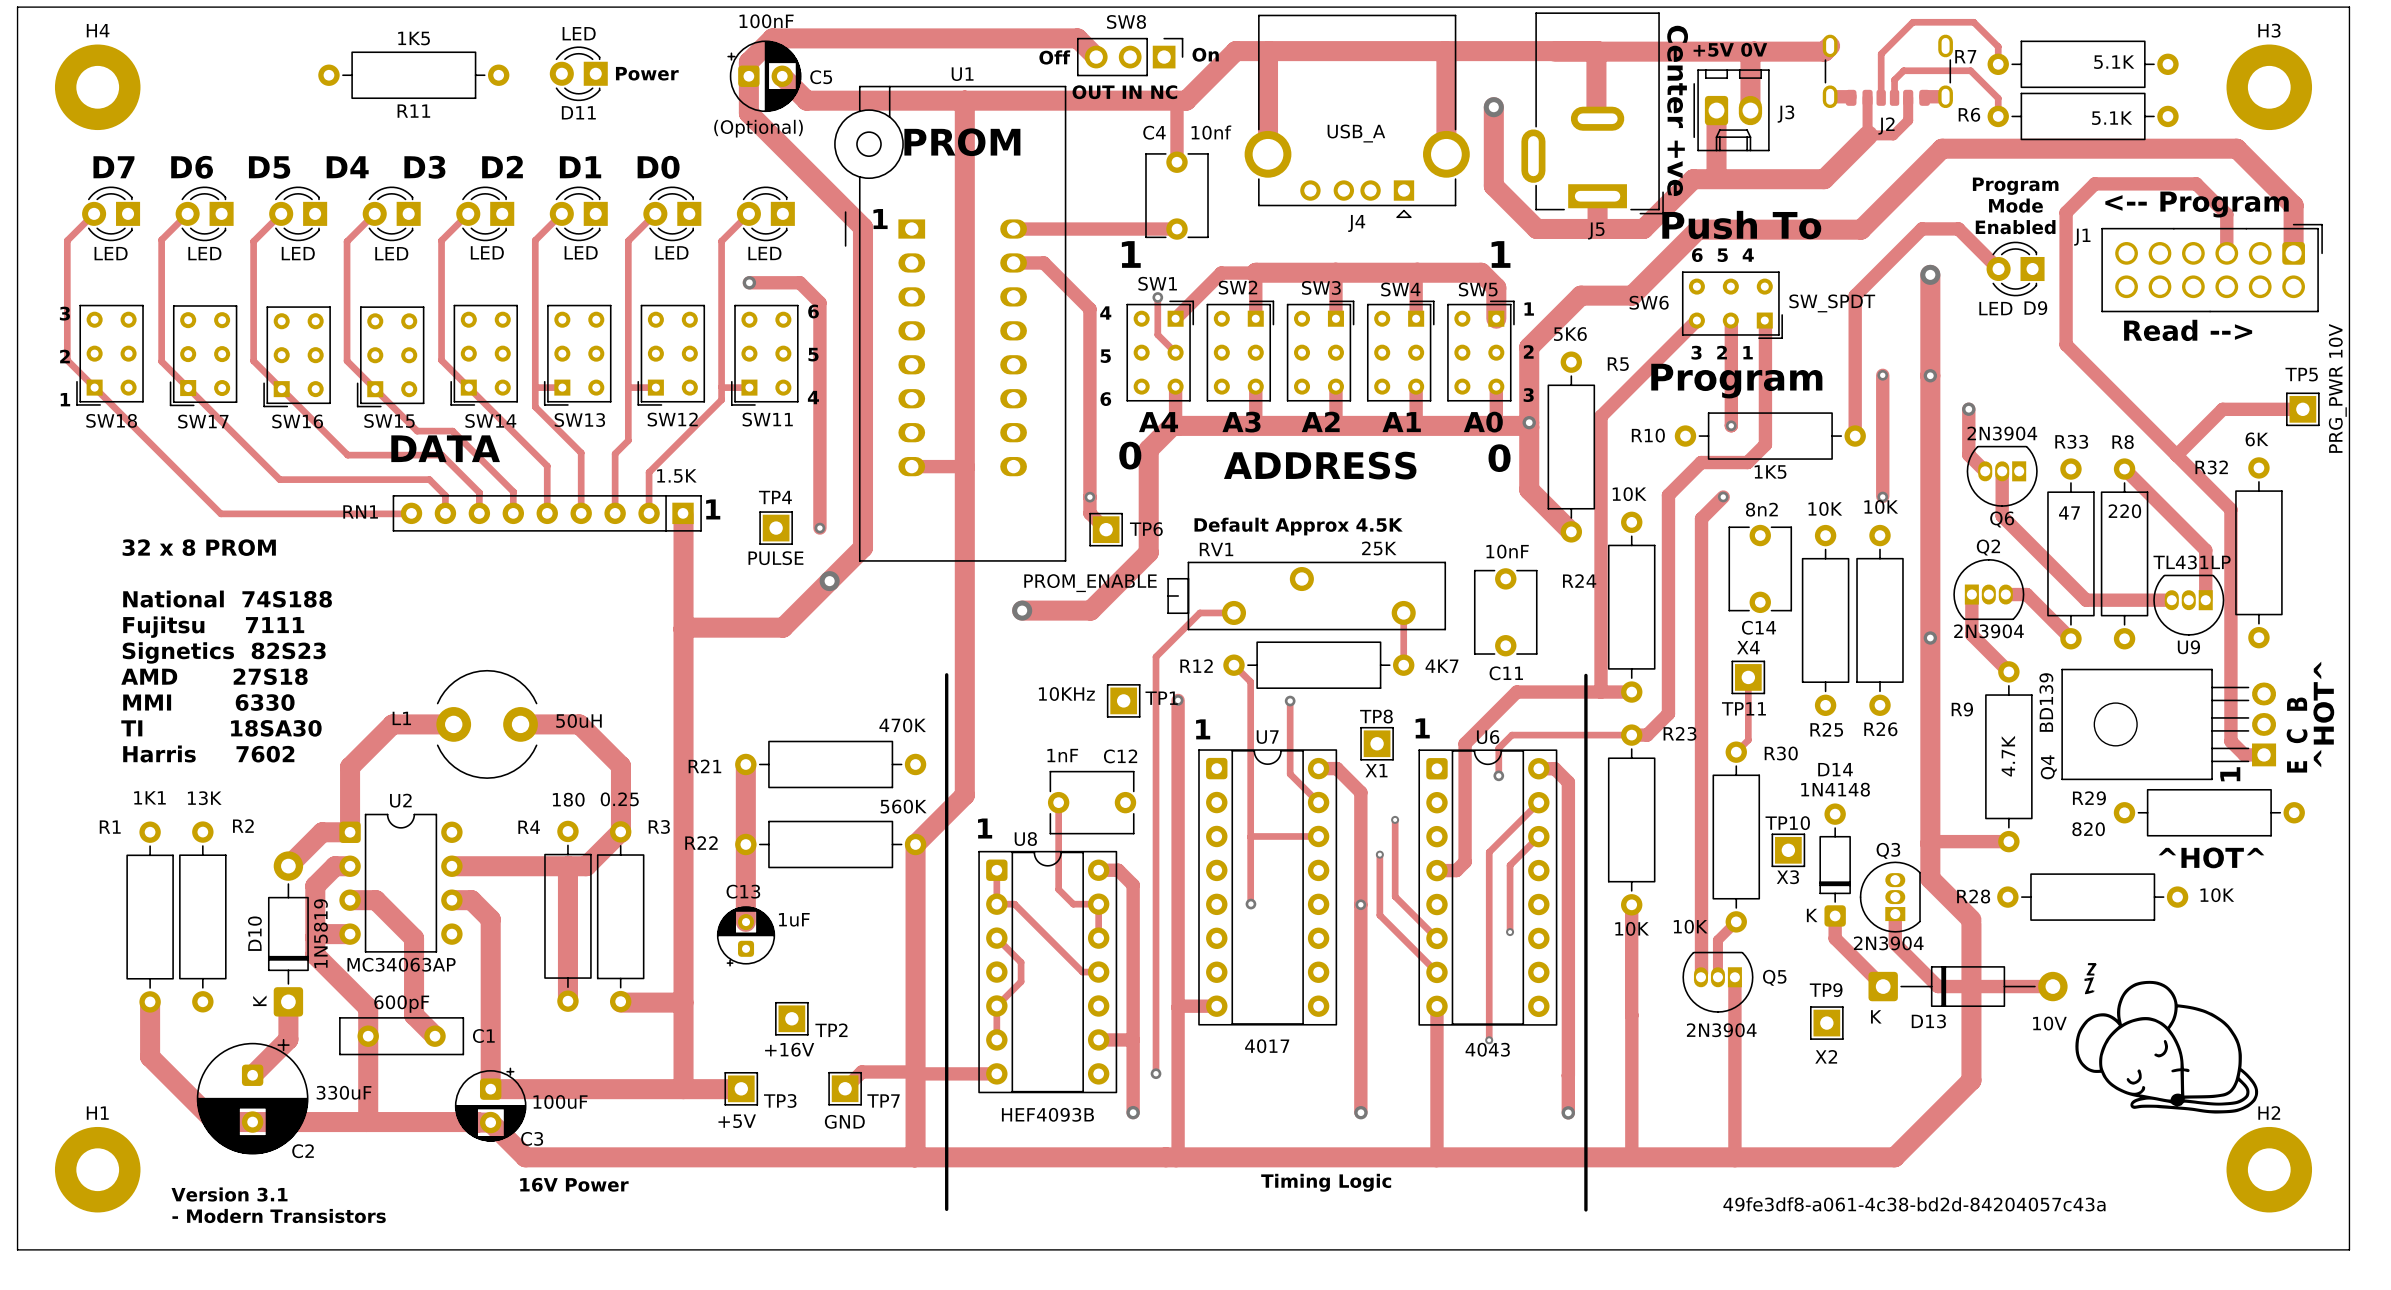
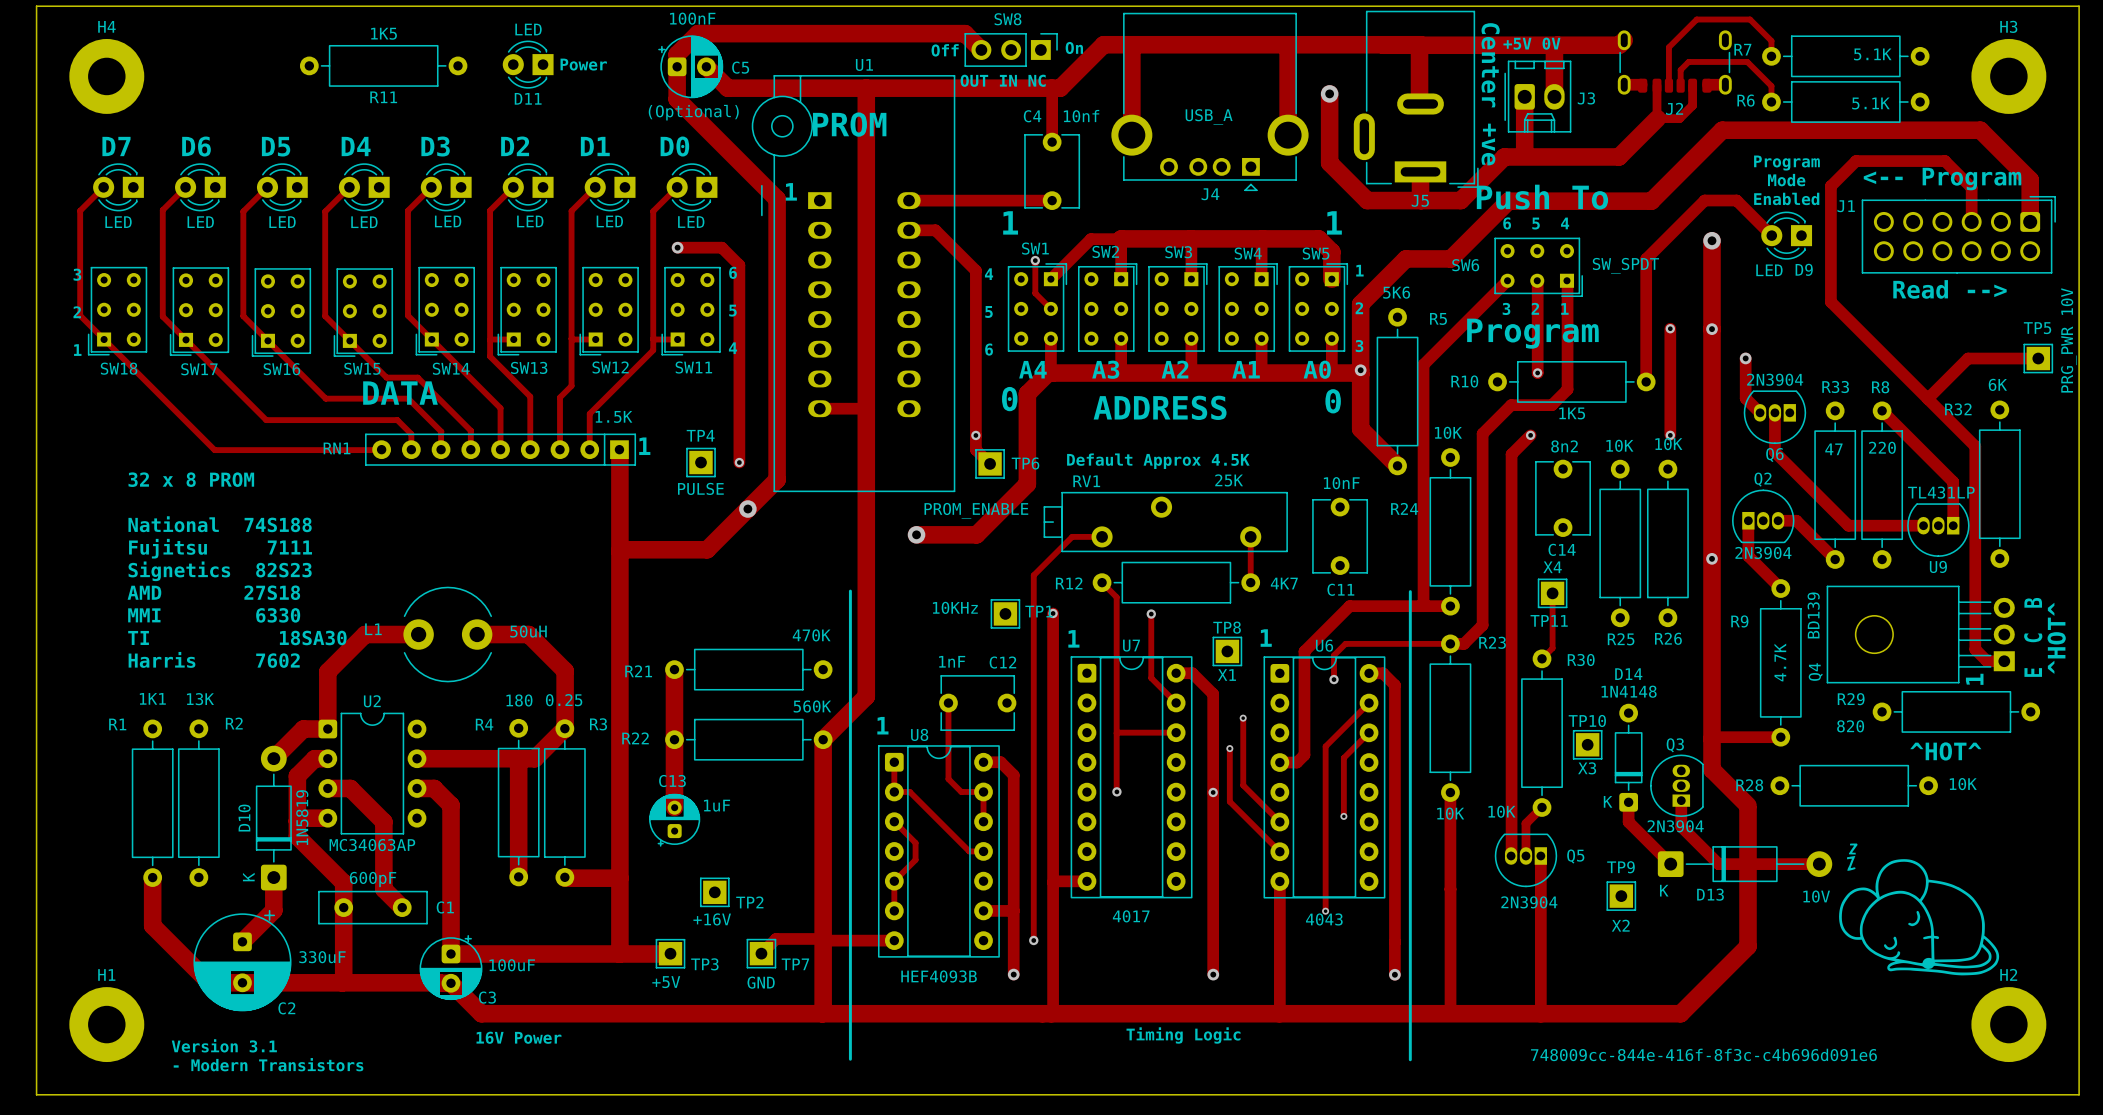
text: 49fe3df8-a061-4c38-bd2d-84204057c43a (1914, 1204) -> 748009cc-844e-416f-8f3c-c4b696d091e6 (1703, 1054)

